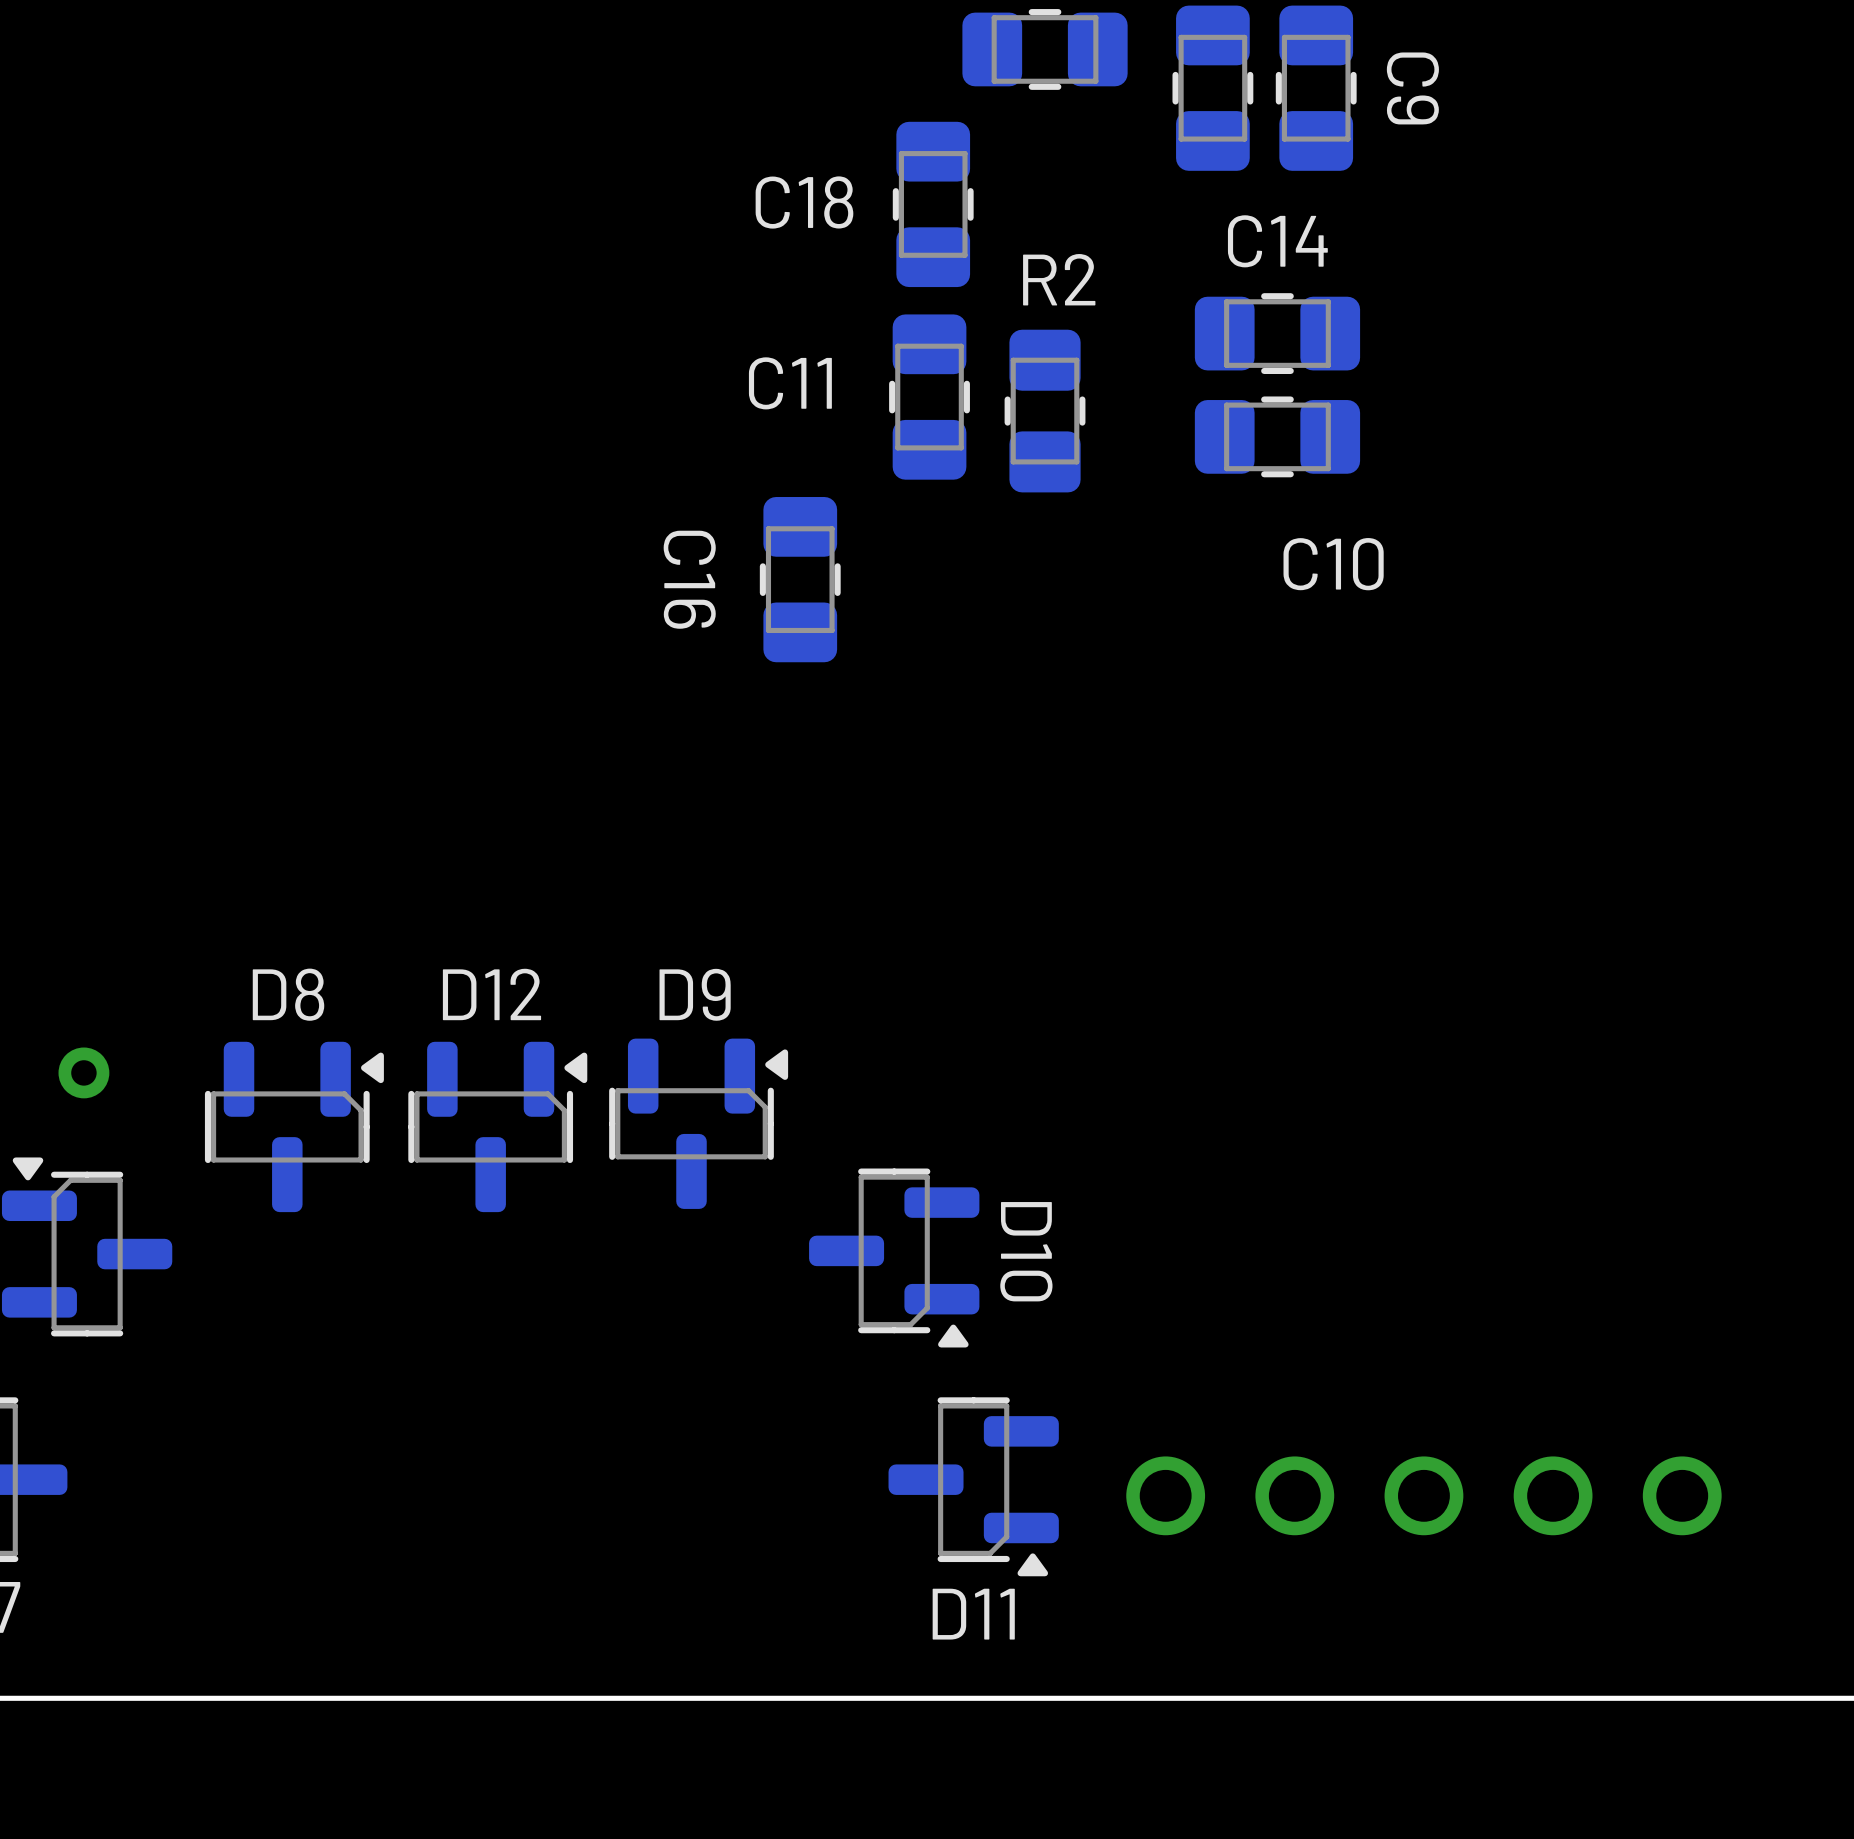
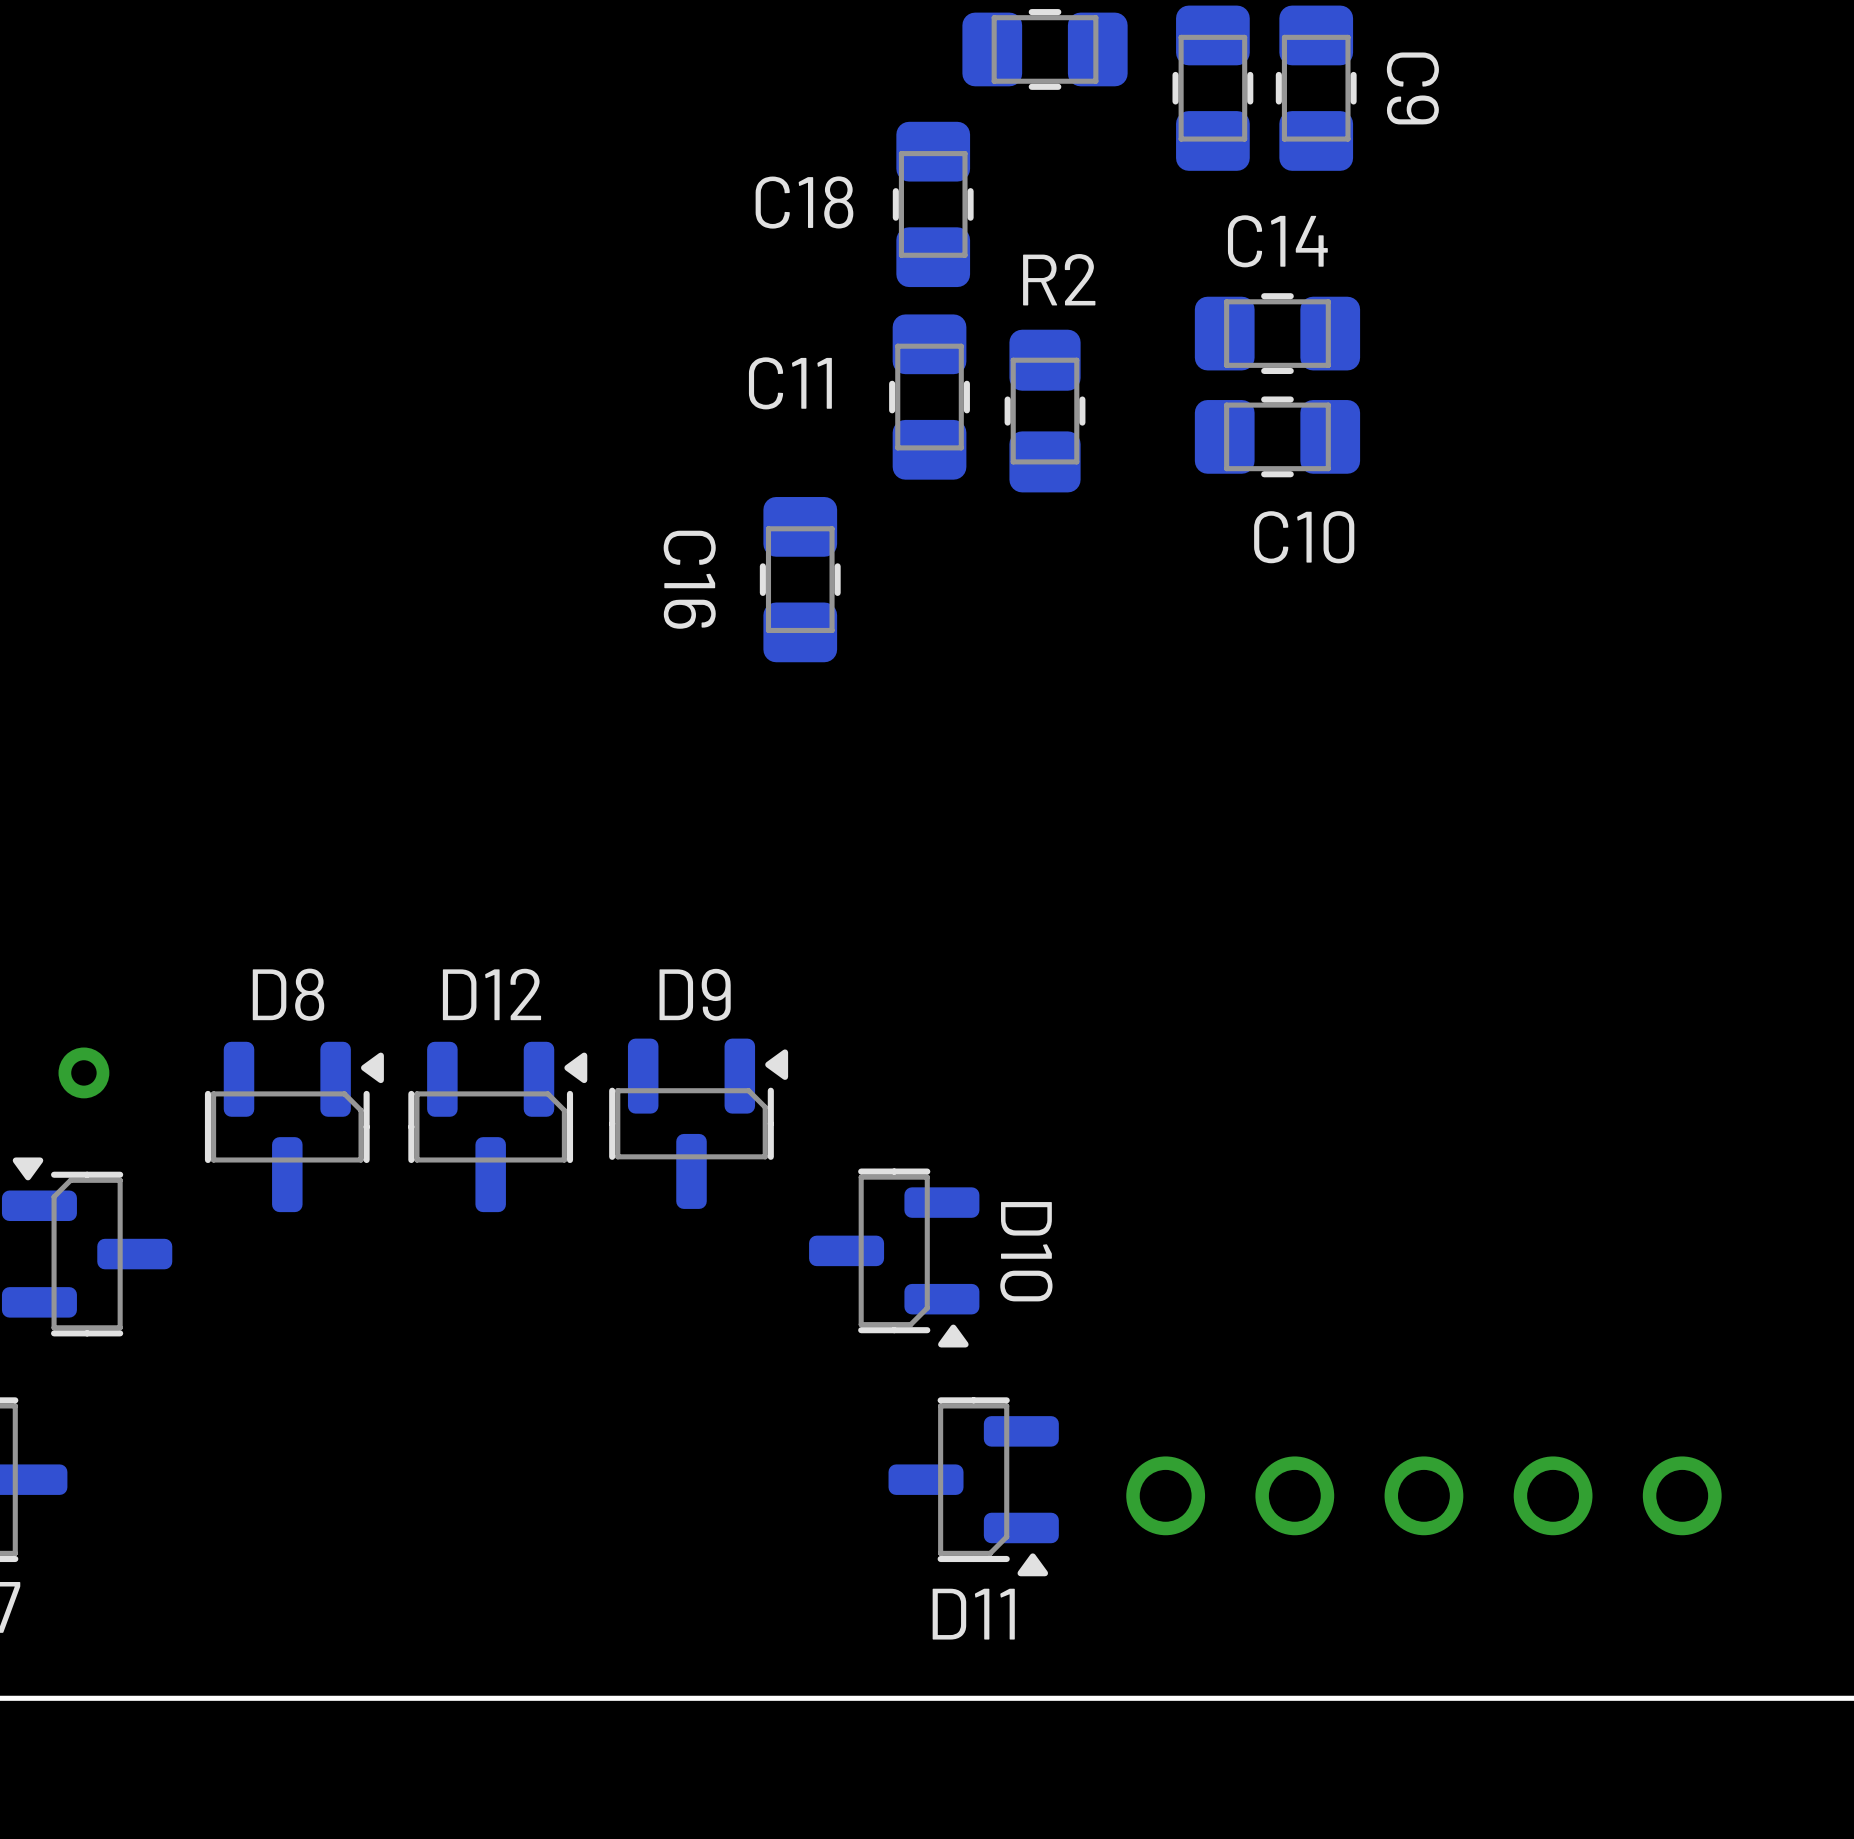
C10 name position: C10 (1333, 564) -> C10 (1304, 537)

